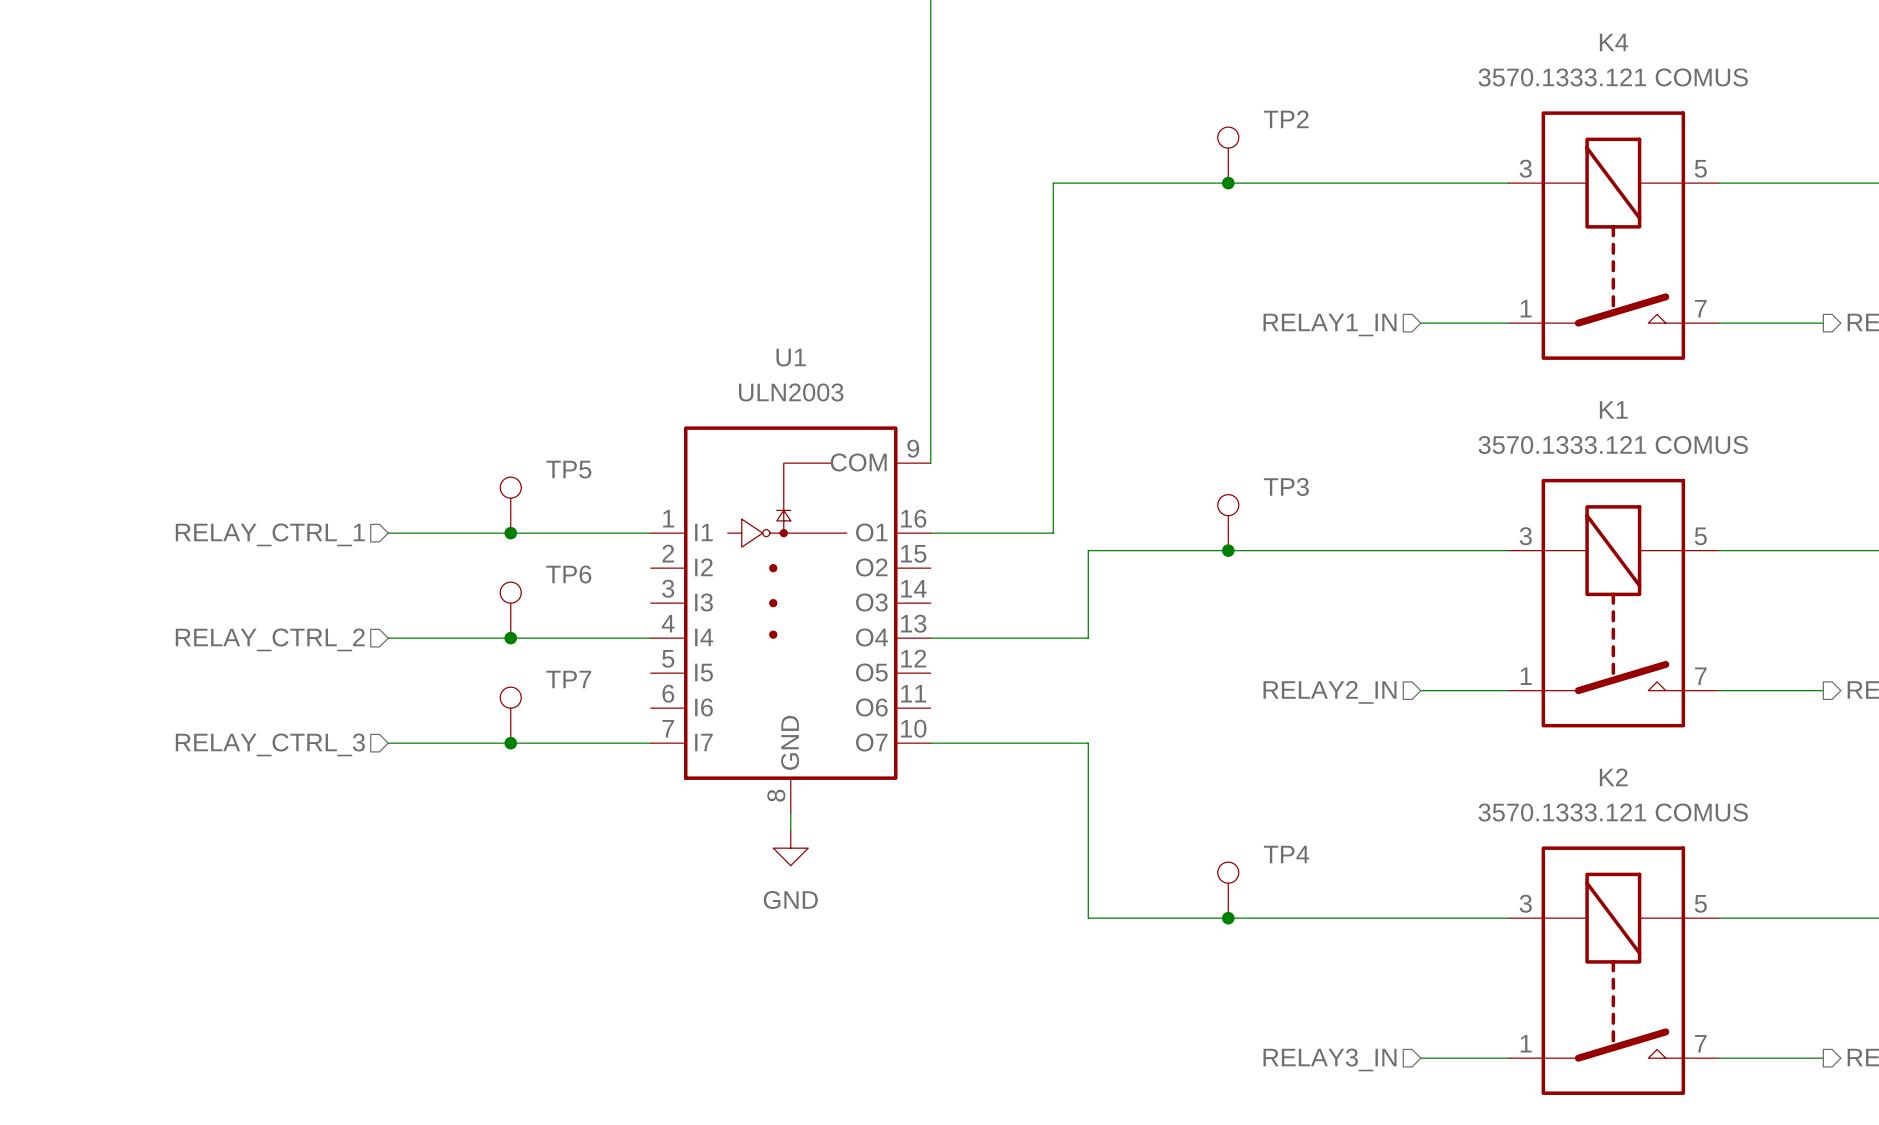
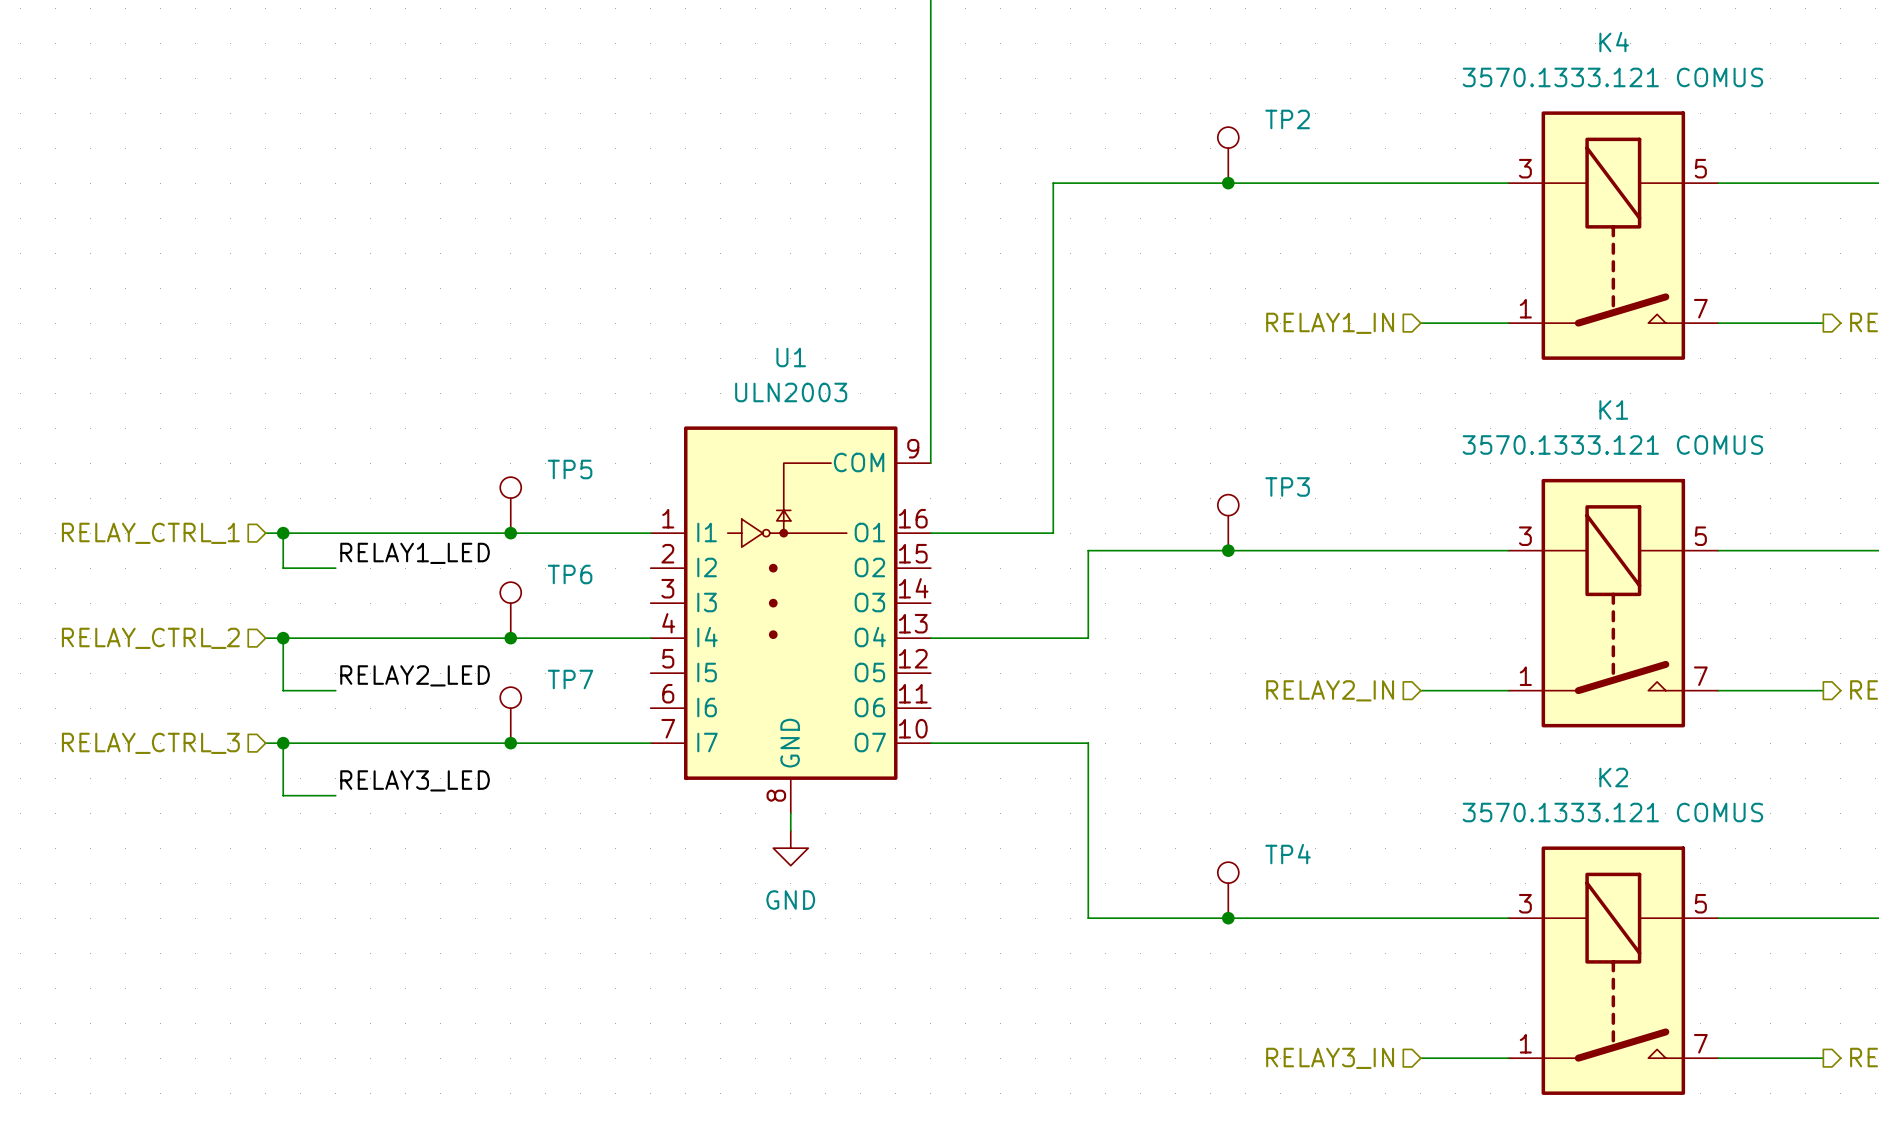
wire: none -> (265, 533) (388, 533)
wire: none -> (283, 533) (283, 568) (335, 568)
junction: none -> (283, 533)
hierarchical label position: RELAY_CTRL_1 (270, 534) -> RELAY_CTRL_1 (150, 533)
label: none -> RELAY1_LED (415, 553)
wire: none -> (265, 638) (388, 638)
wire: none -> (283, 638) (283, 690) (335, 690)
junction: none -> (283, 638)
hierarchical label position: RELAY_CTRL_2 (270, 639) -> RELAY_CTRL_2 (150, 638)
label: none -> RELAY2_LED (415, 675)
wire: none -> (265, 743) (388, 743)
wire: none -> (283, 743) (283, 795) (335, 795)
junction: none -> (283, 743)
hierarchical label position: RELAY_CTRL_3 (270, 744) -> RELAY_CTRL_3 (150, 743)
label: none -> RELAY3_LED (415, 780)

